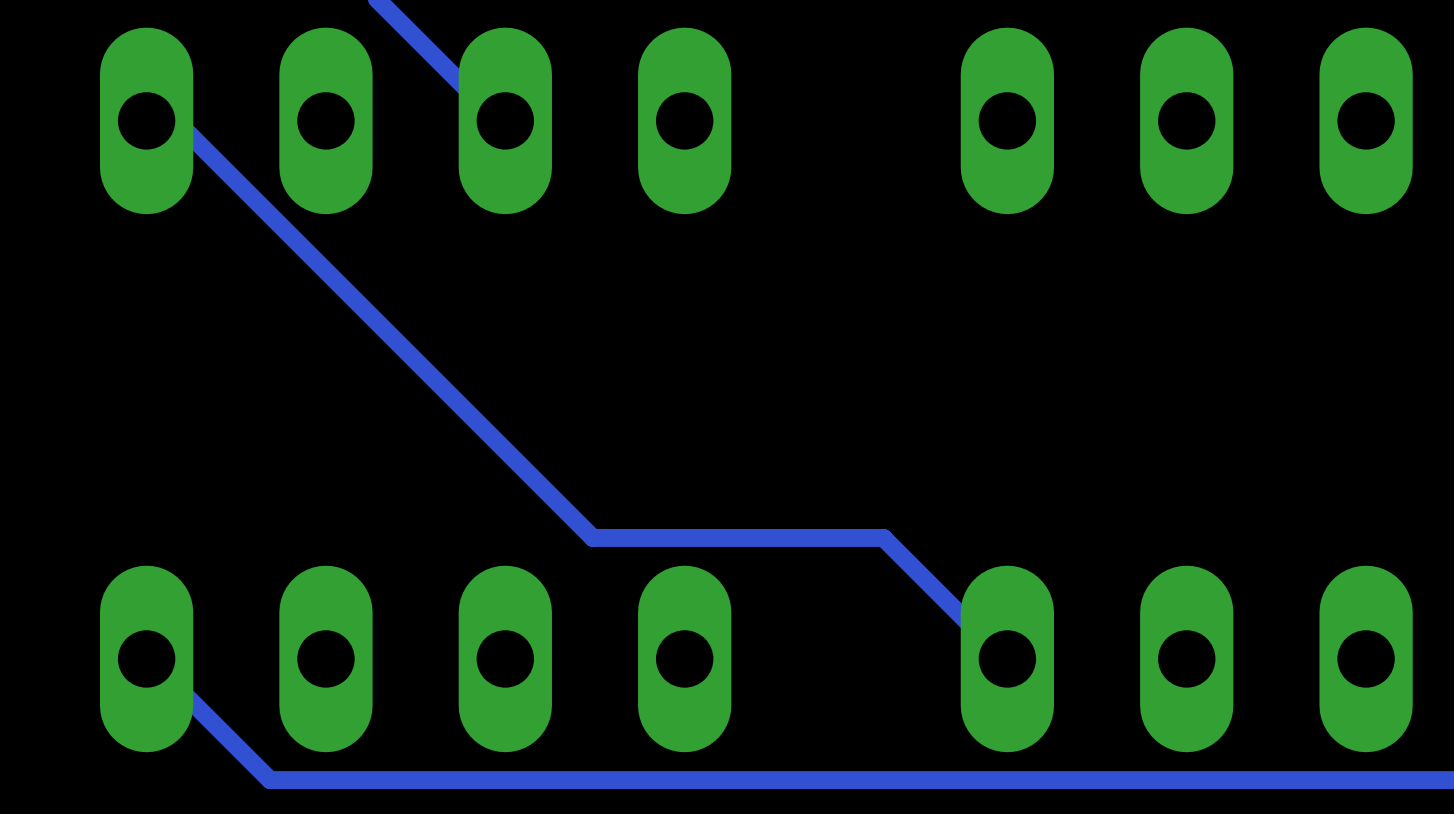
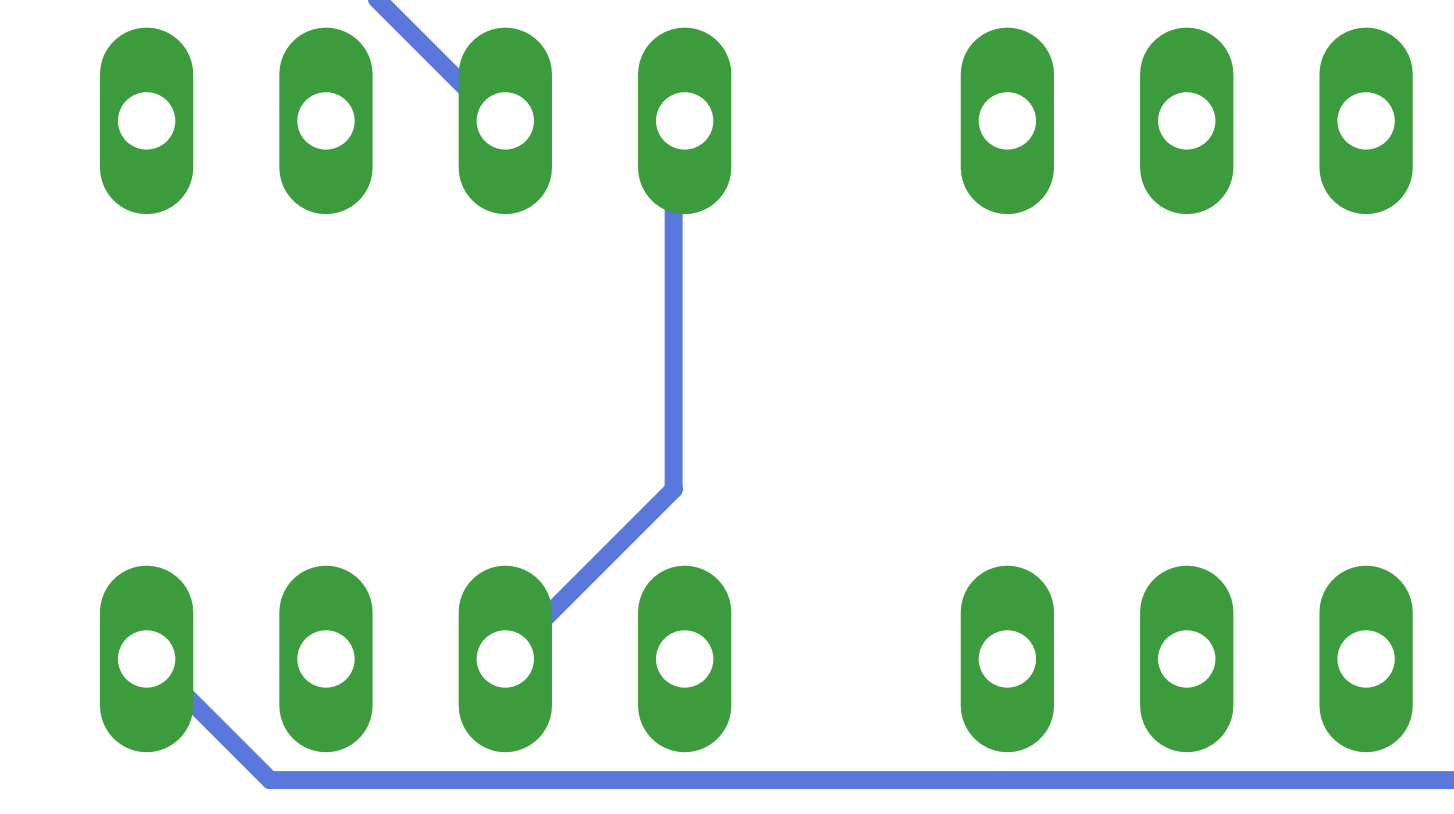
track: (146, 120) (157, 134) (189, 134) (592, 537) (883, 537) (996, 650) (1007, 658) -> none
track: none -> (684, 120) (673, 134) (673, 489) (505, 658)

